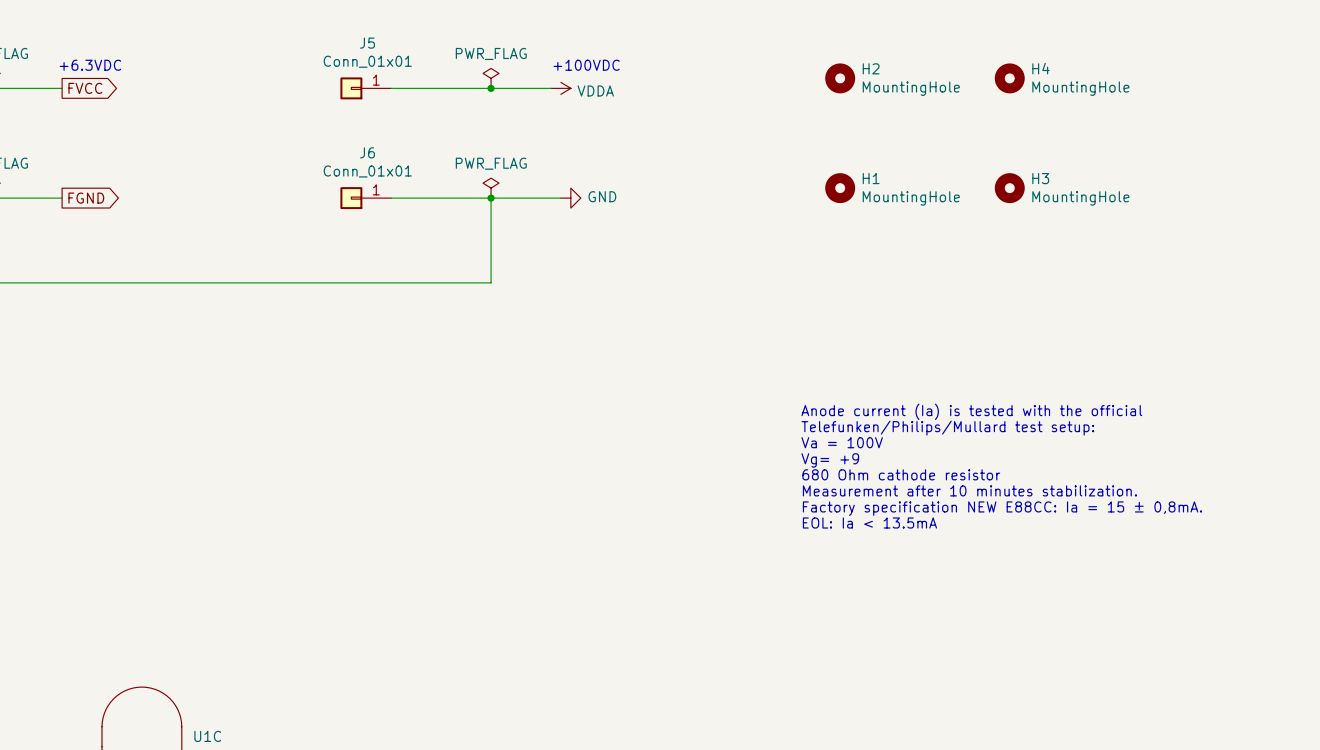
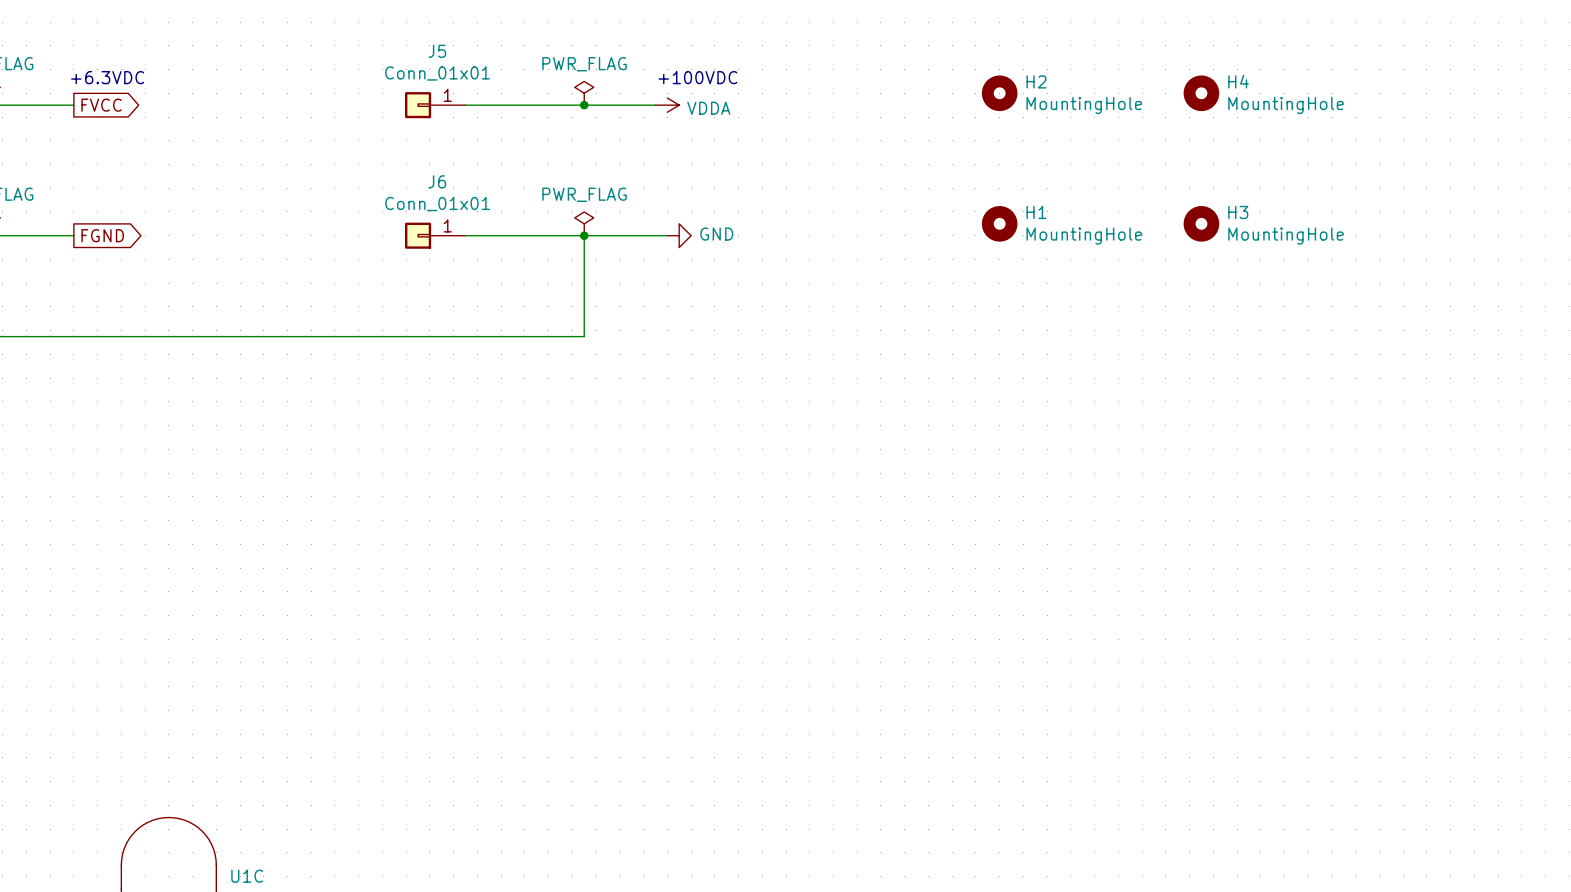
text: Anode current (Ia) is tested with the official (971, 411) -> none
text: Telefunken/Philips/Mullard test setup: (947, 428) -> none
text: Va = 100V (842, 442) -> none
text: Vg= +9 (830, 460) -> none
text: 680 Ohm cathode resistor (901, 474) -> none
text: Measurement after 10 minutes stabilization. (969, 490) -> none
text: Factory specification NEW E88CC: Ia = 15 ± 0,8mA. (1002, 508) -> none
text: EOL: Ia < 13.5mA (869, 523) -> none

